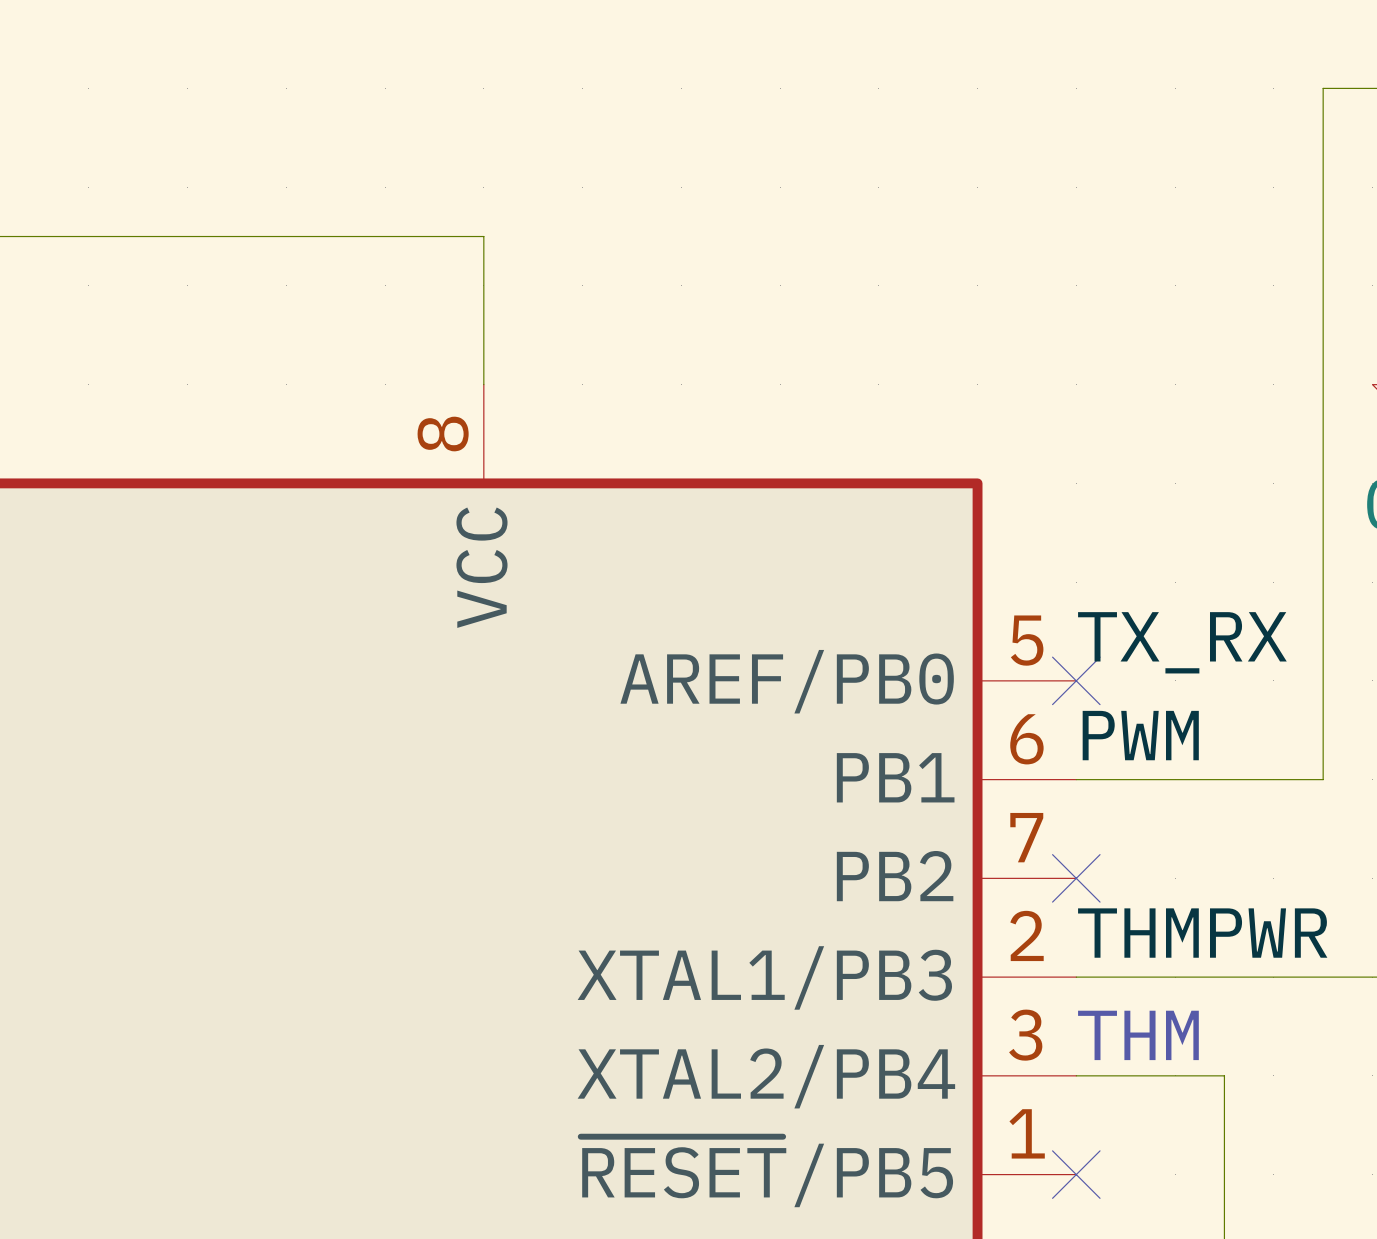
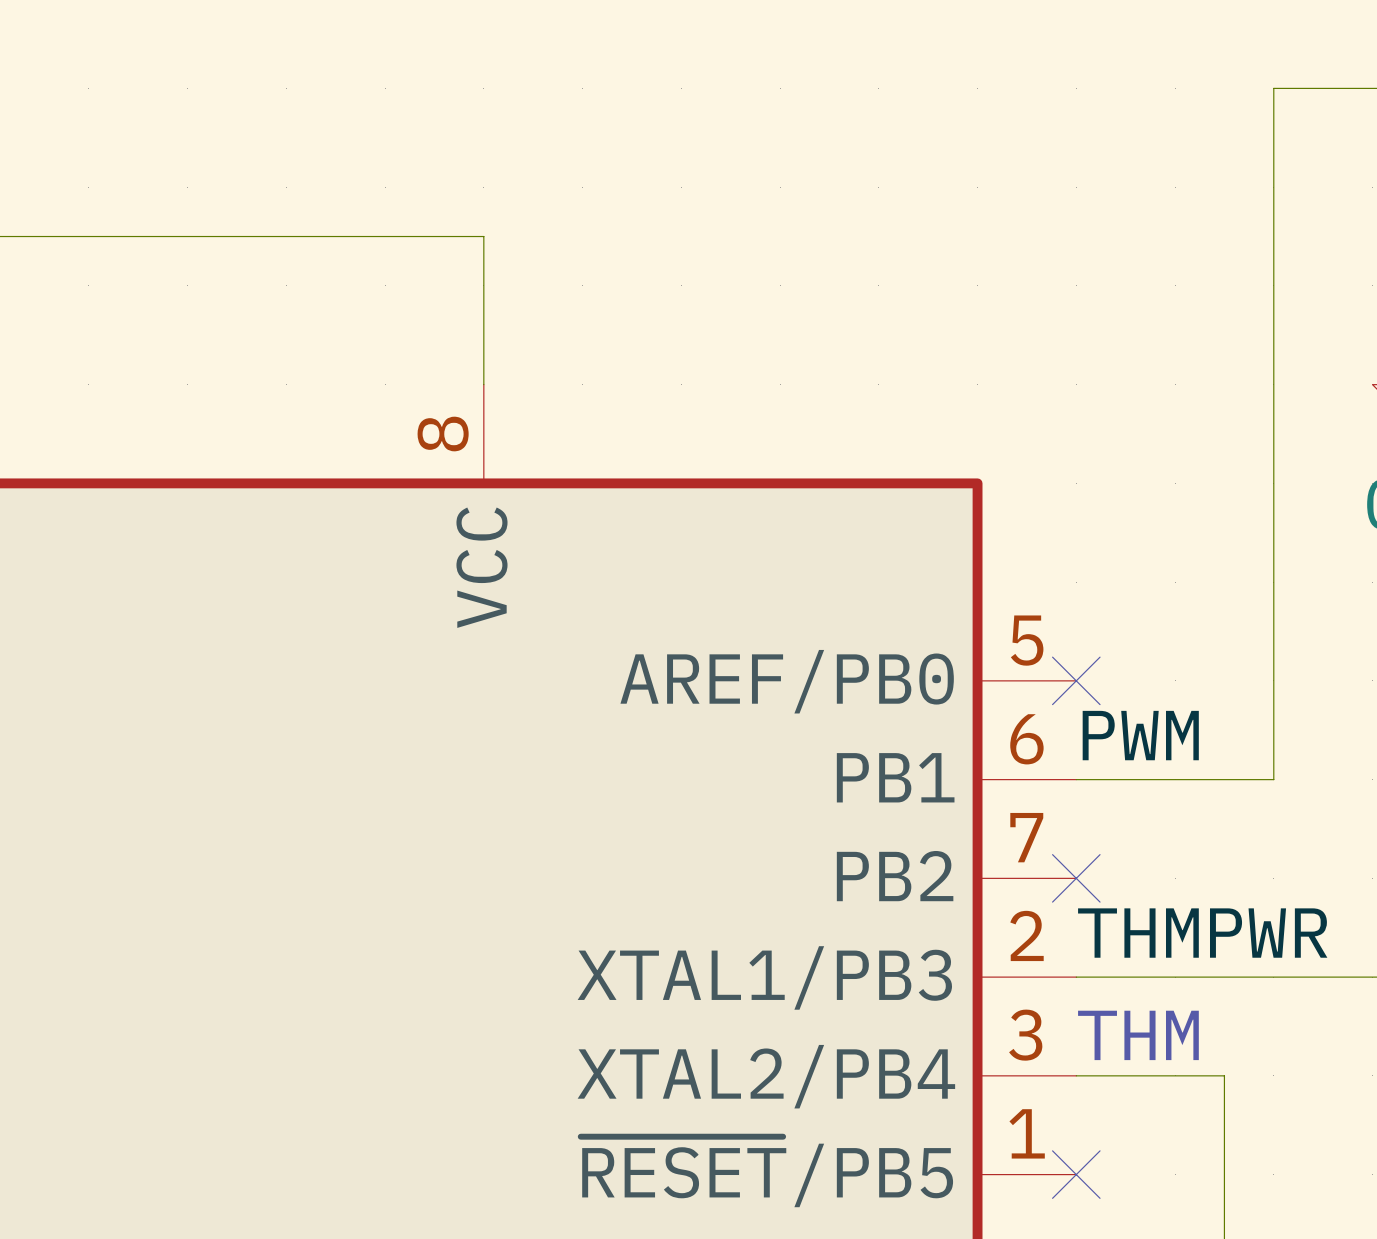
wire: (1323, 88) (1323, 779) (1273, 779) -> (1323, 88) (1273, 88) (1273, 779)
label: TX_RX (1182, 642) -> none

